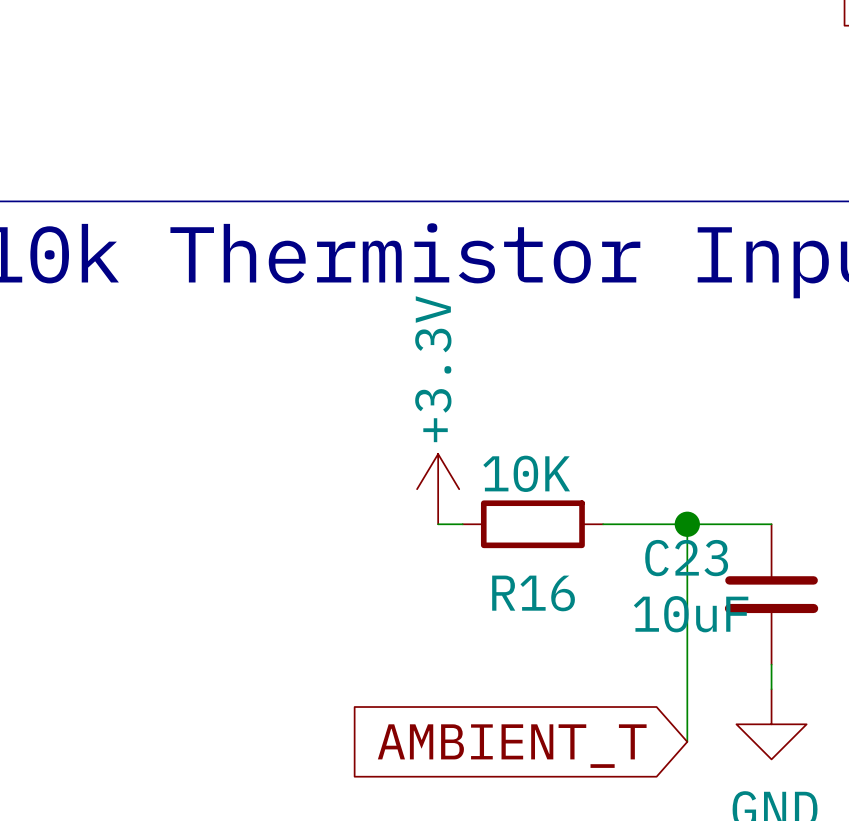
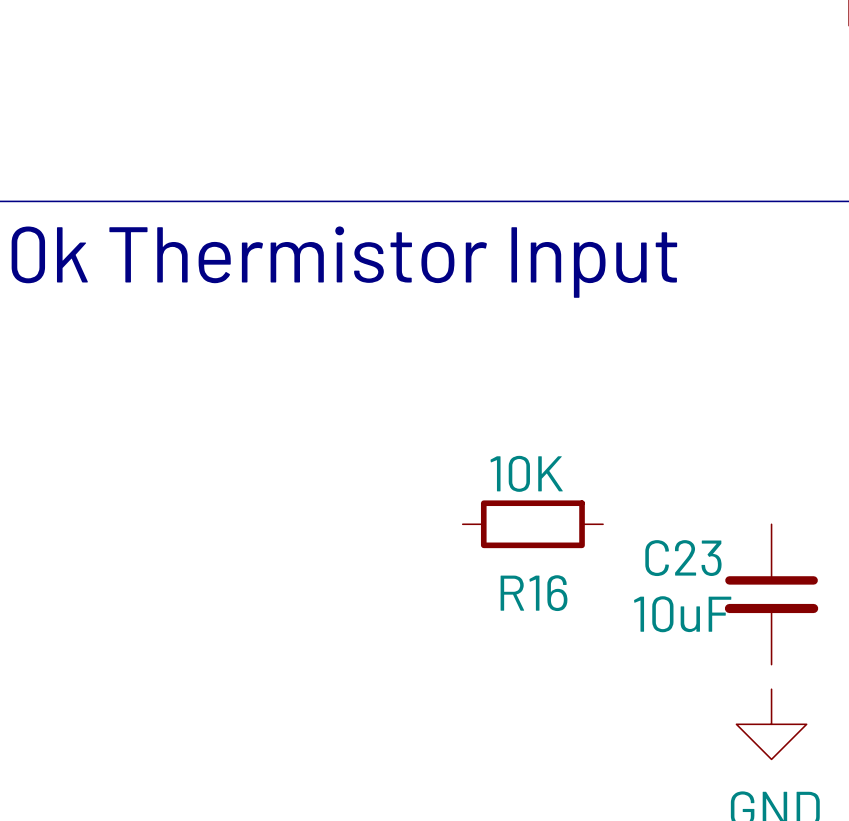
power symbol: +3.3V (438, 489) -> none
wire: (438, 524) (462, 524) -> none
wire: (603, 524) (771, 524) -> none
wire: (687, 524) (687, 741) -> none
junction: (687, 524) -> none
wire: (771, 664) (771, 689) -> none
global label: AMBIENT_T (512, 746) -> none

